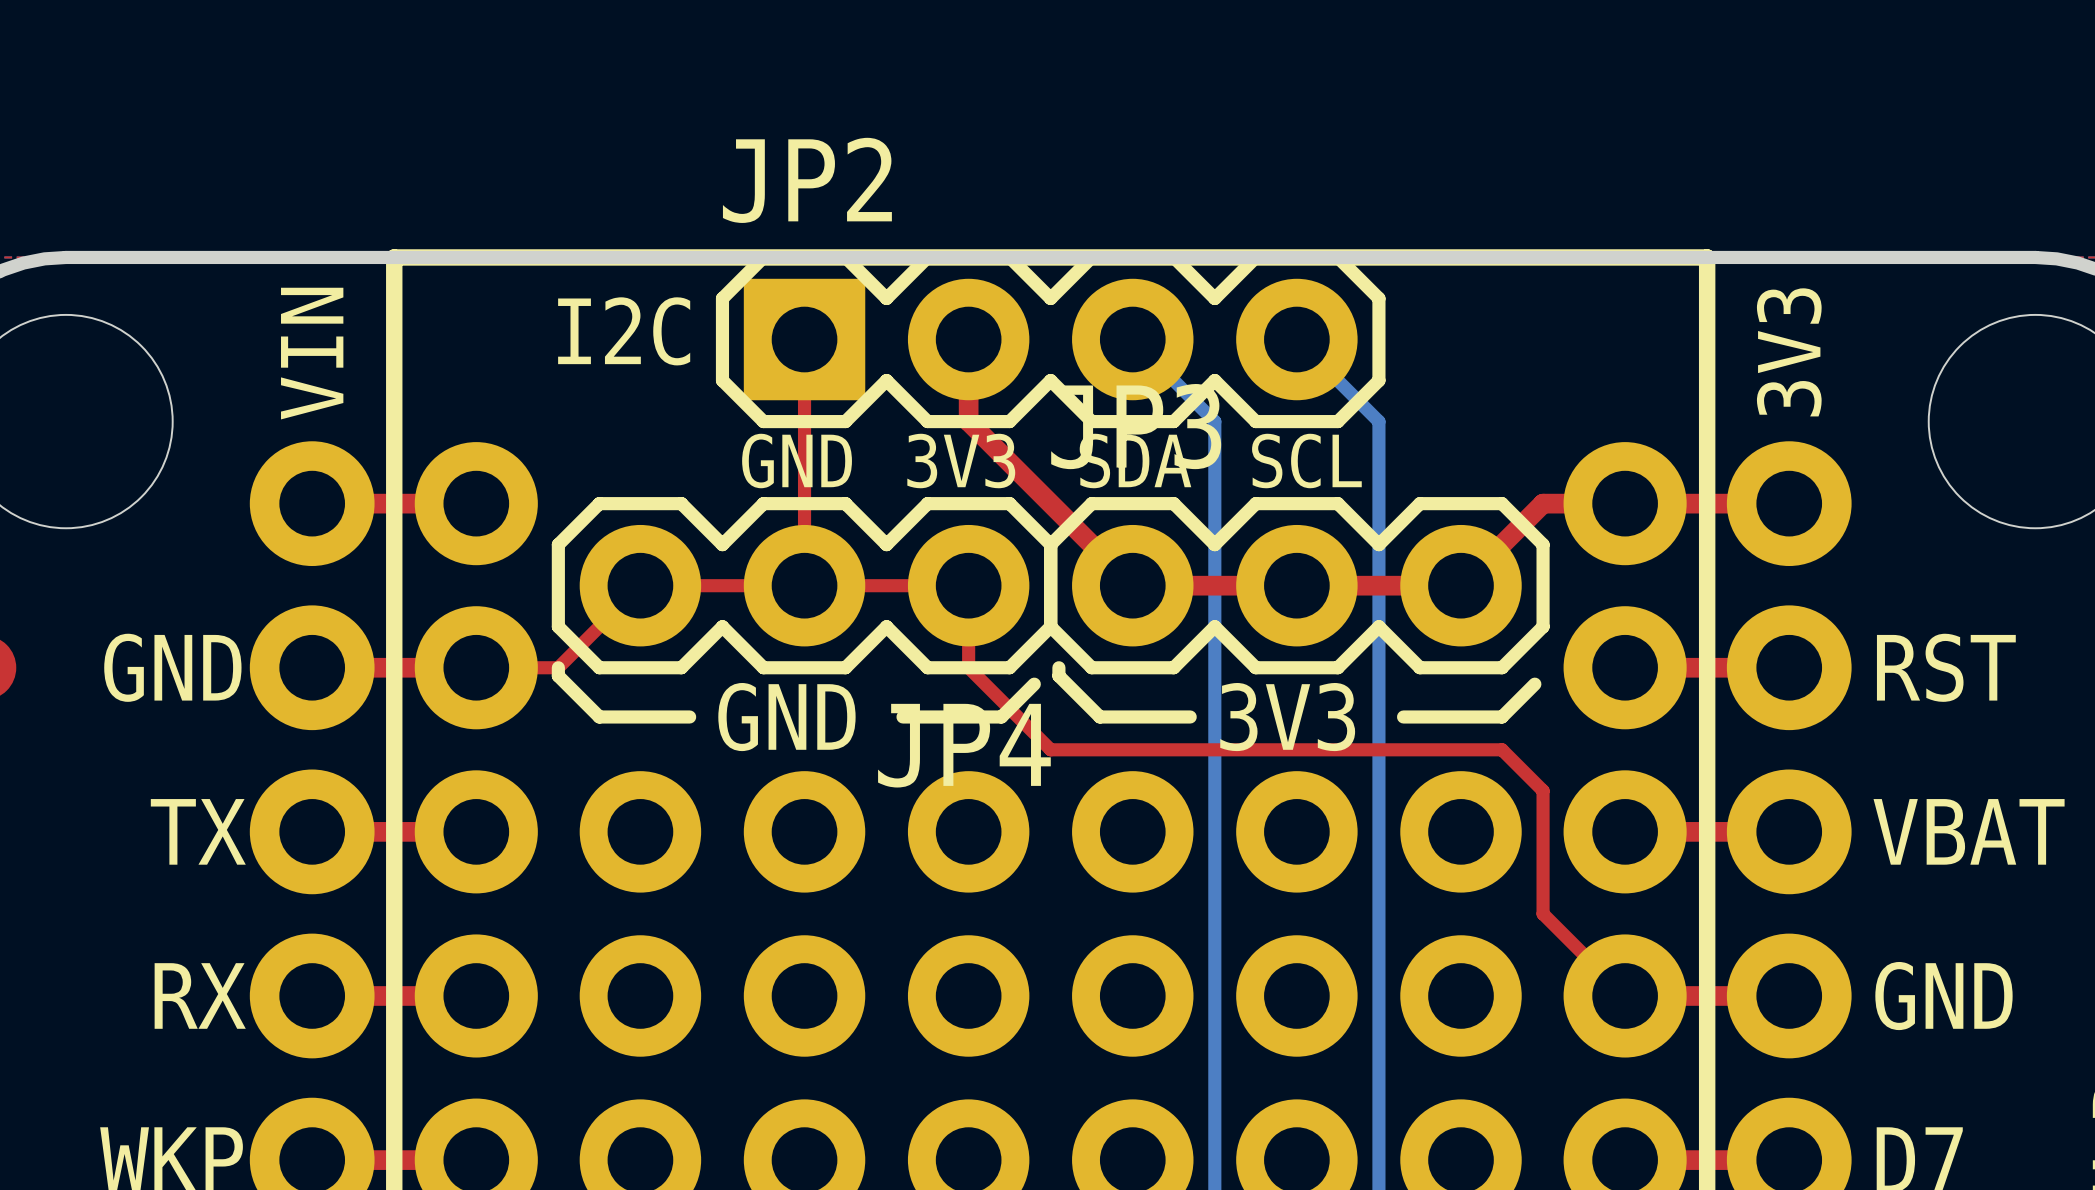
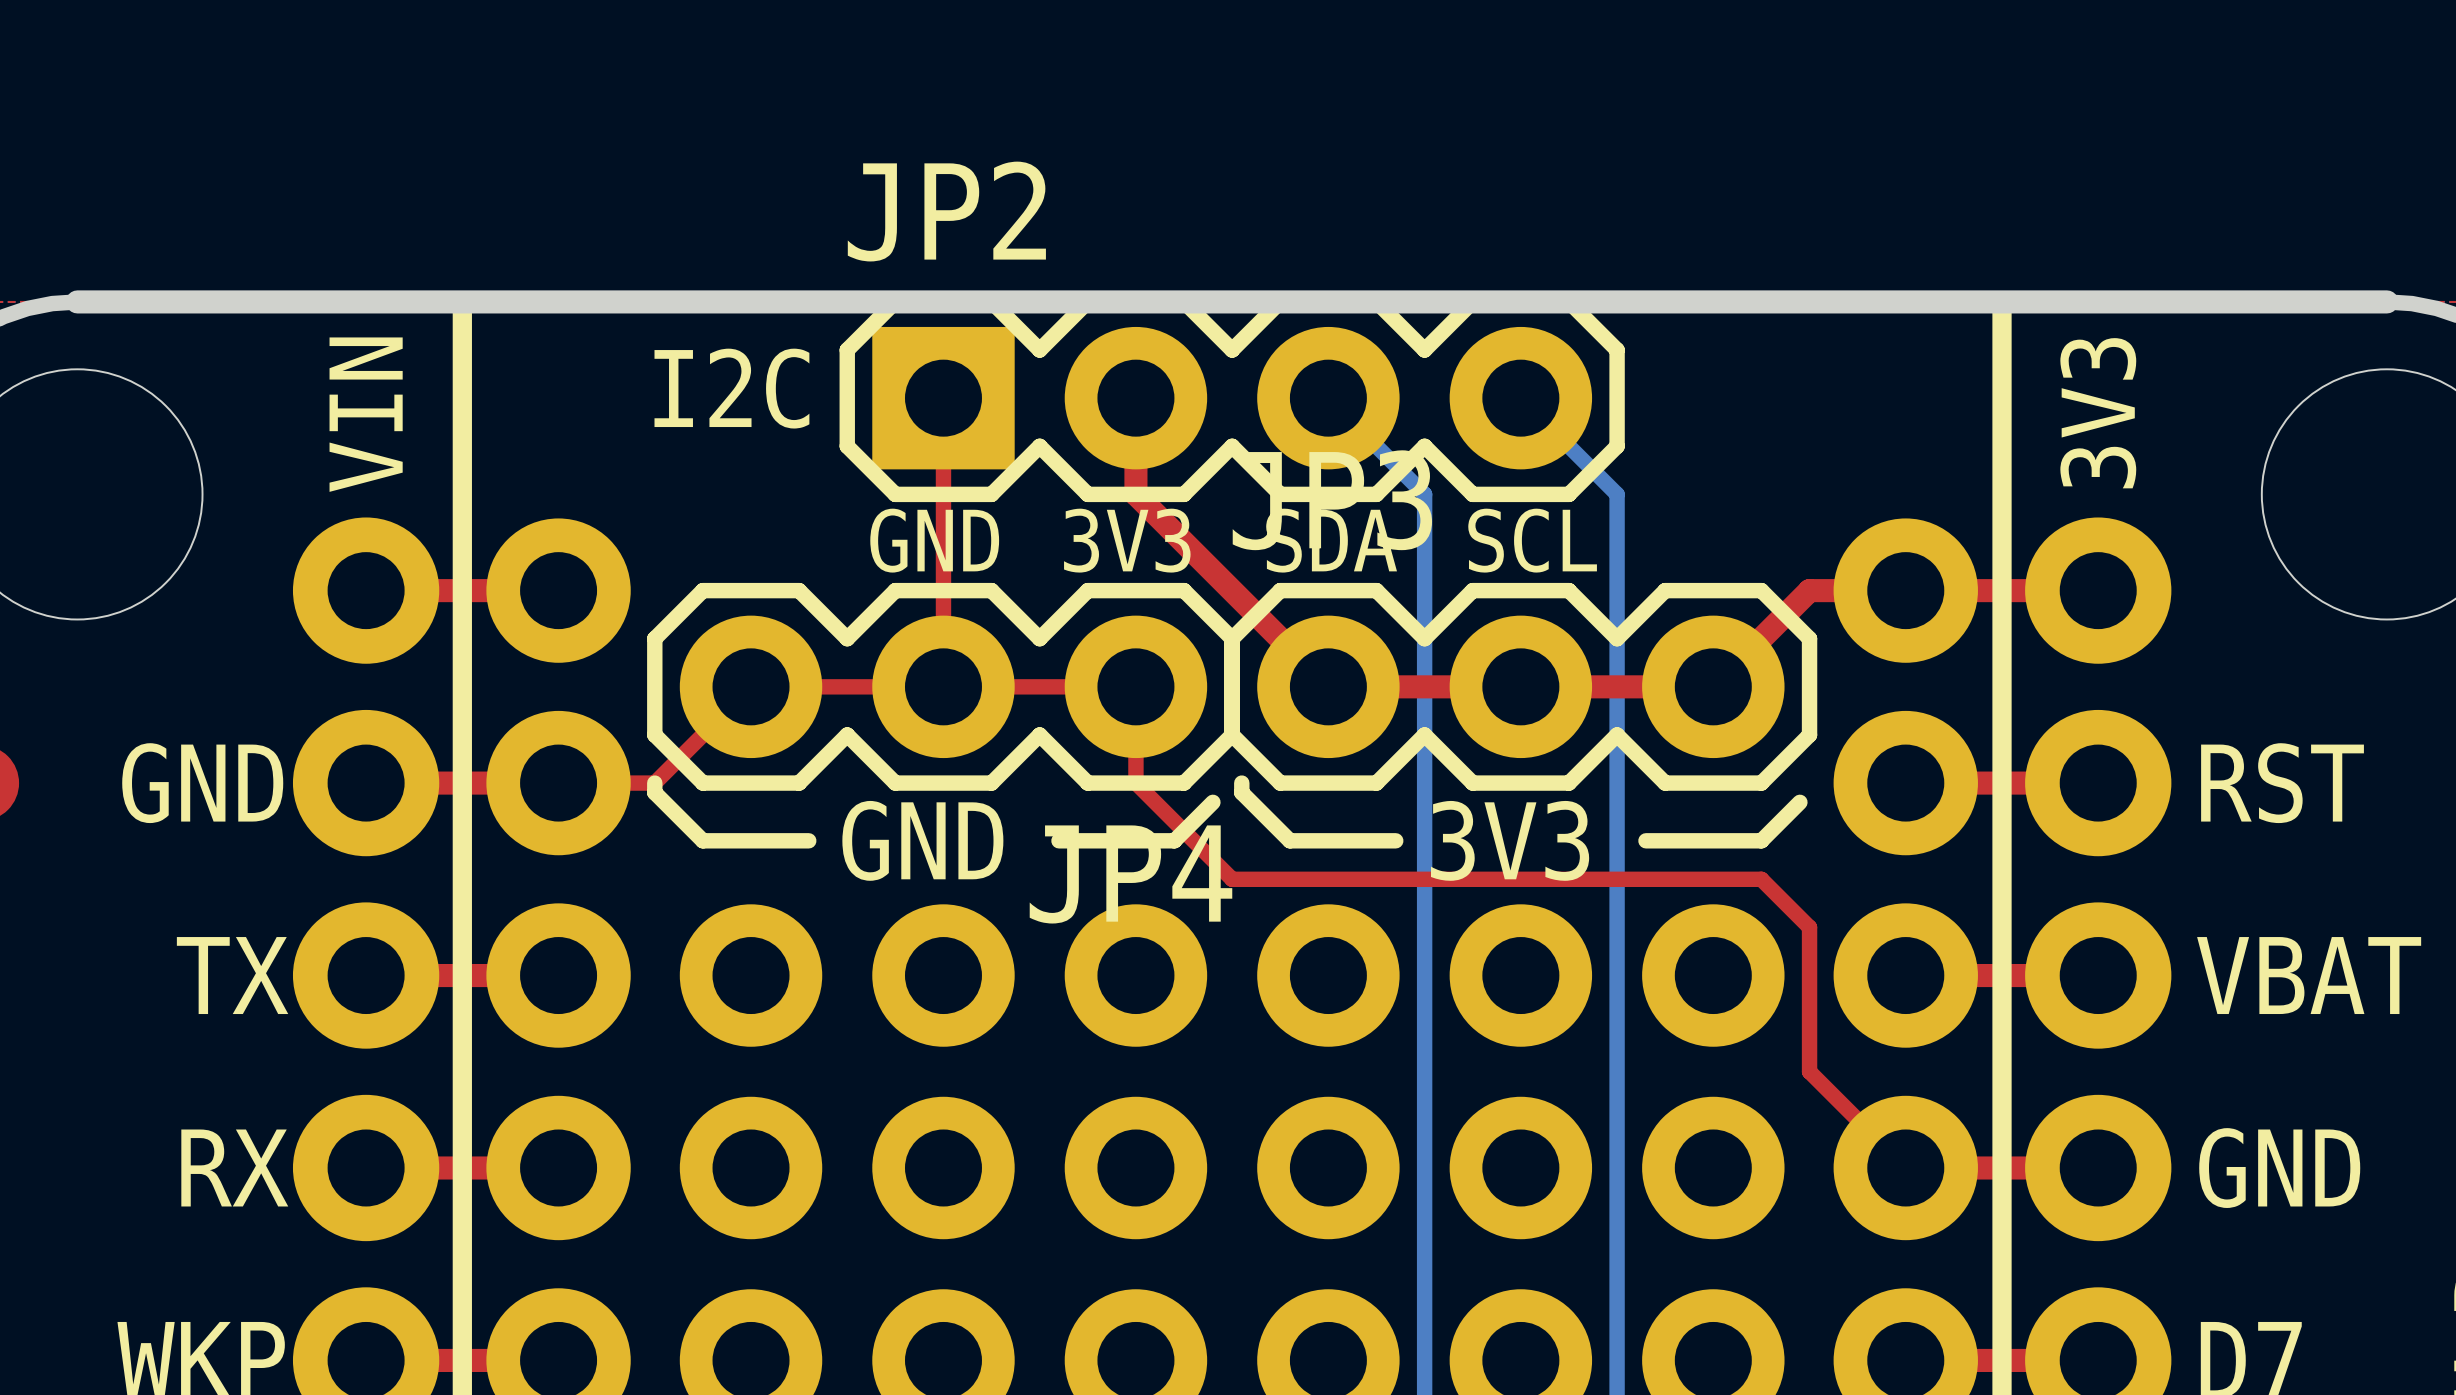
board edge width: thin (66, 257) (2035, 257) -> thick (77, 301) (2386, 301)

